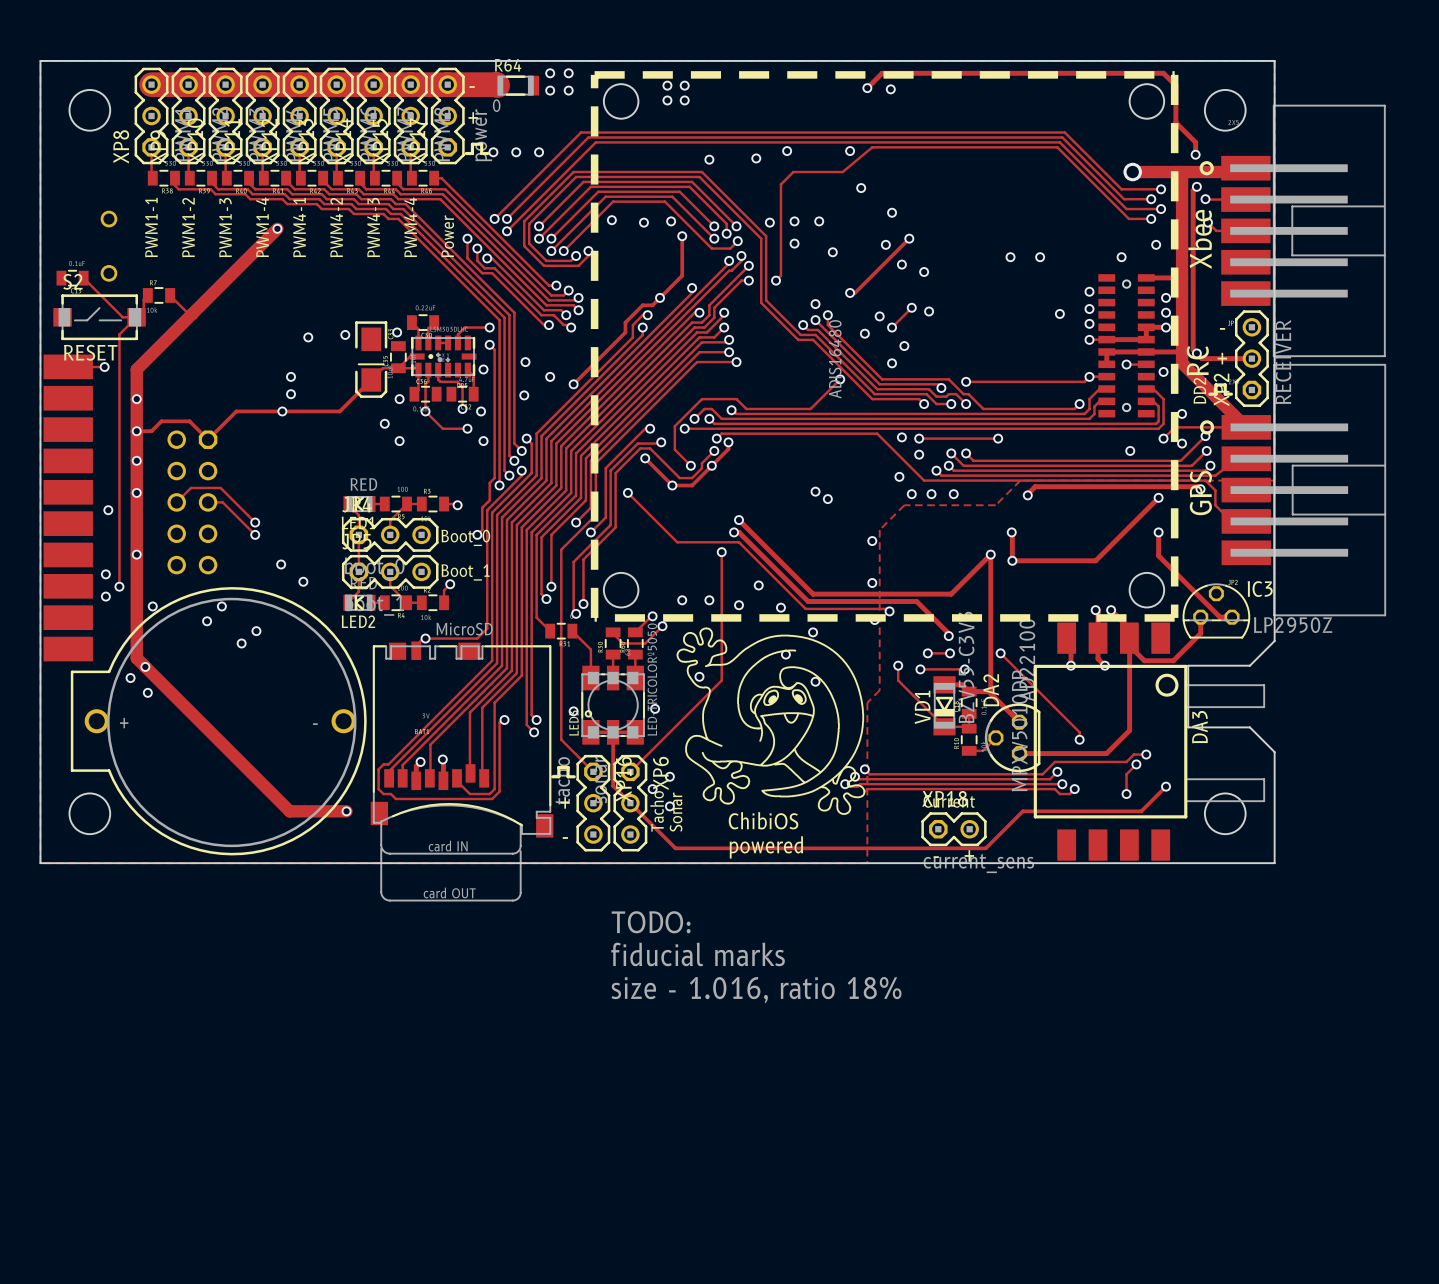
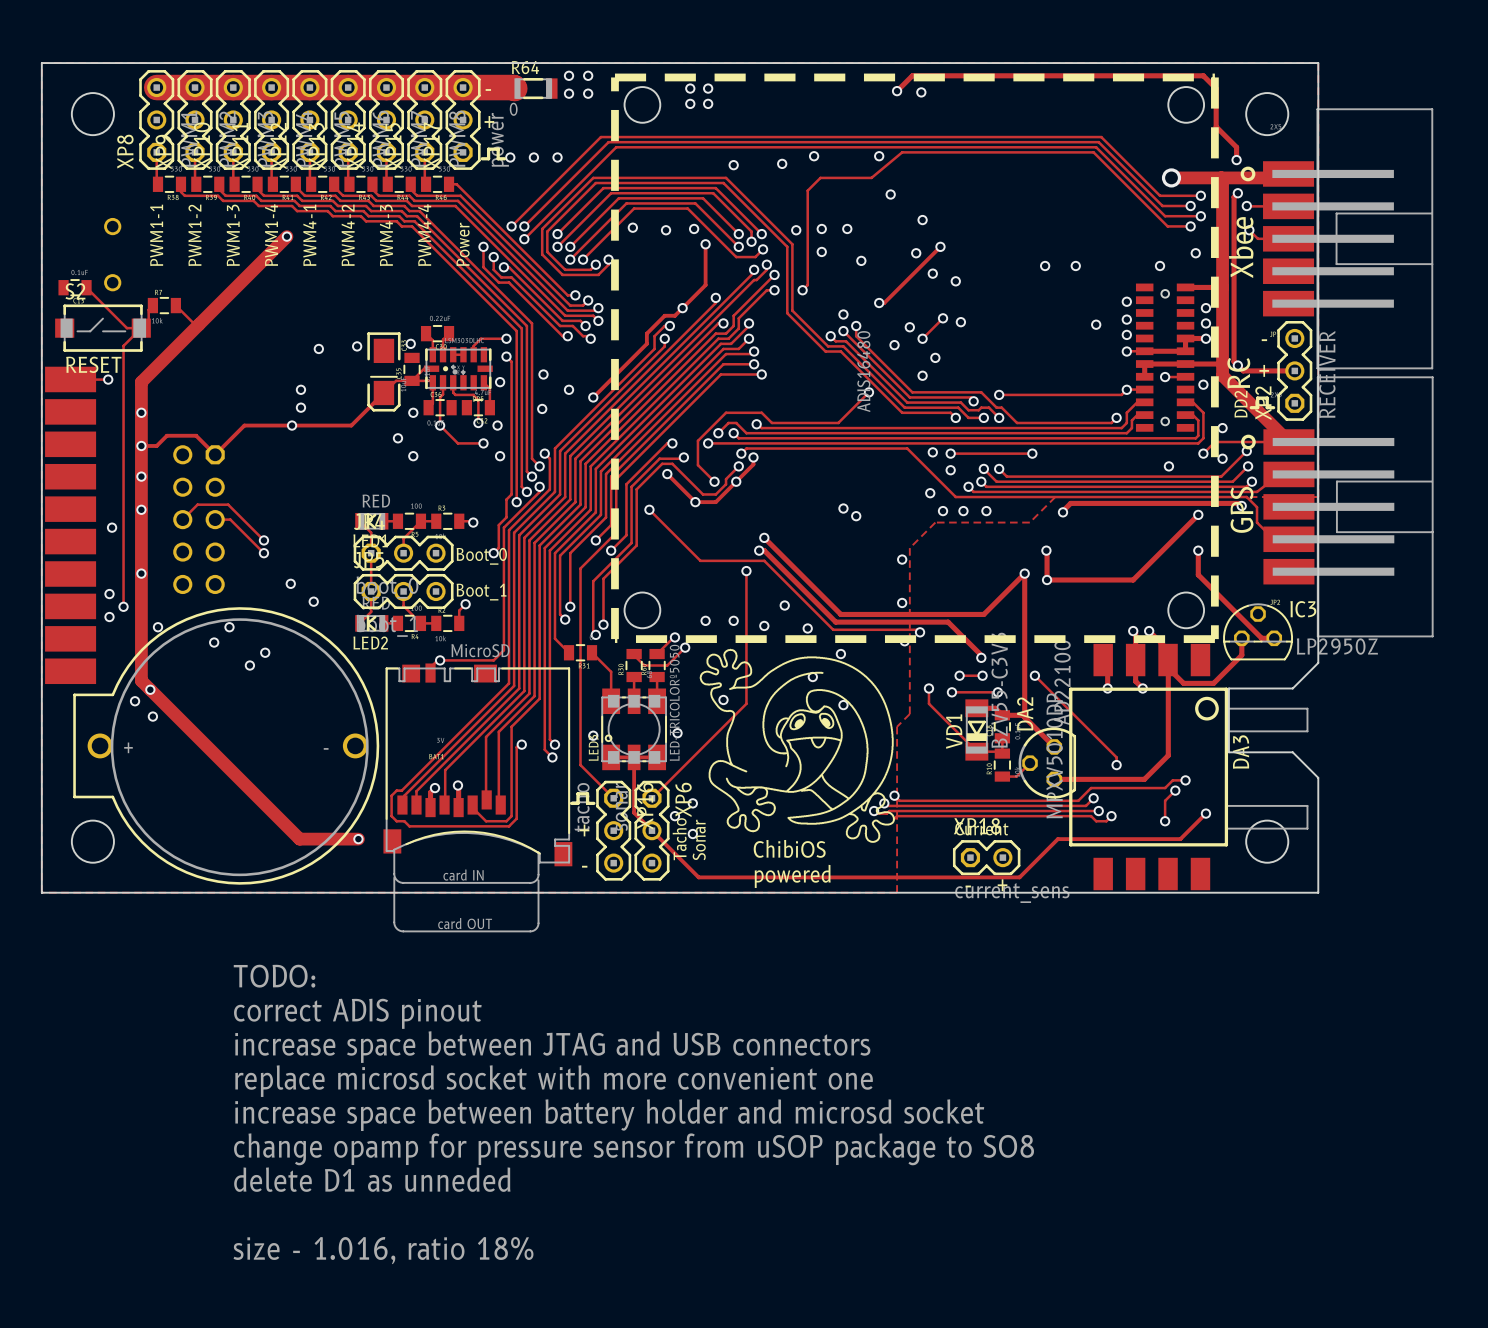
text: TODO: (651, 922) -> none
text: none -> TODO: (274, 976)
text: fiducial marks (698, 954) -> none
text: none -> correct ADIS pinout (357, 1013)
text: size - 1.016, ratio 18% (756, 990) -> none
text: none -> increase space between JTAG and USB connectors (552, 1047)
text: none -> replace microsd socket with more convenient one (554, 1081)
text: none -> increase space between battery holder and microsd socket (609, 1115)
text: none -> change opamp for pressure sensor from uSOP package to SO8 (634, 1149)
text: none -> delete D1 as unneded (372, 1179)
text: none -> size - 1.016, ratio 18% (383, 1250)

